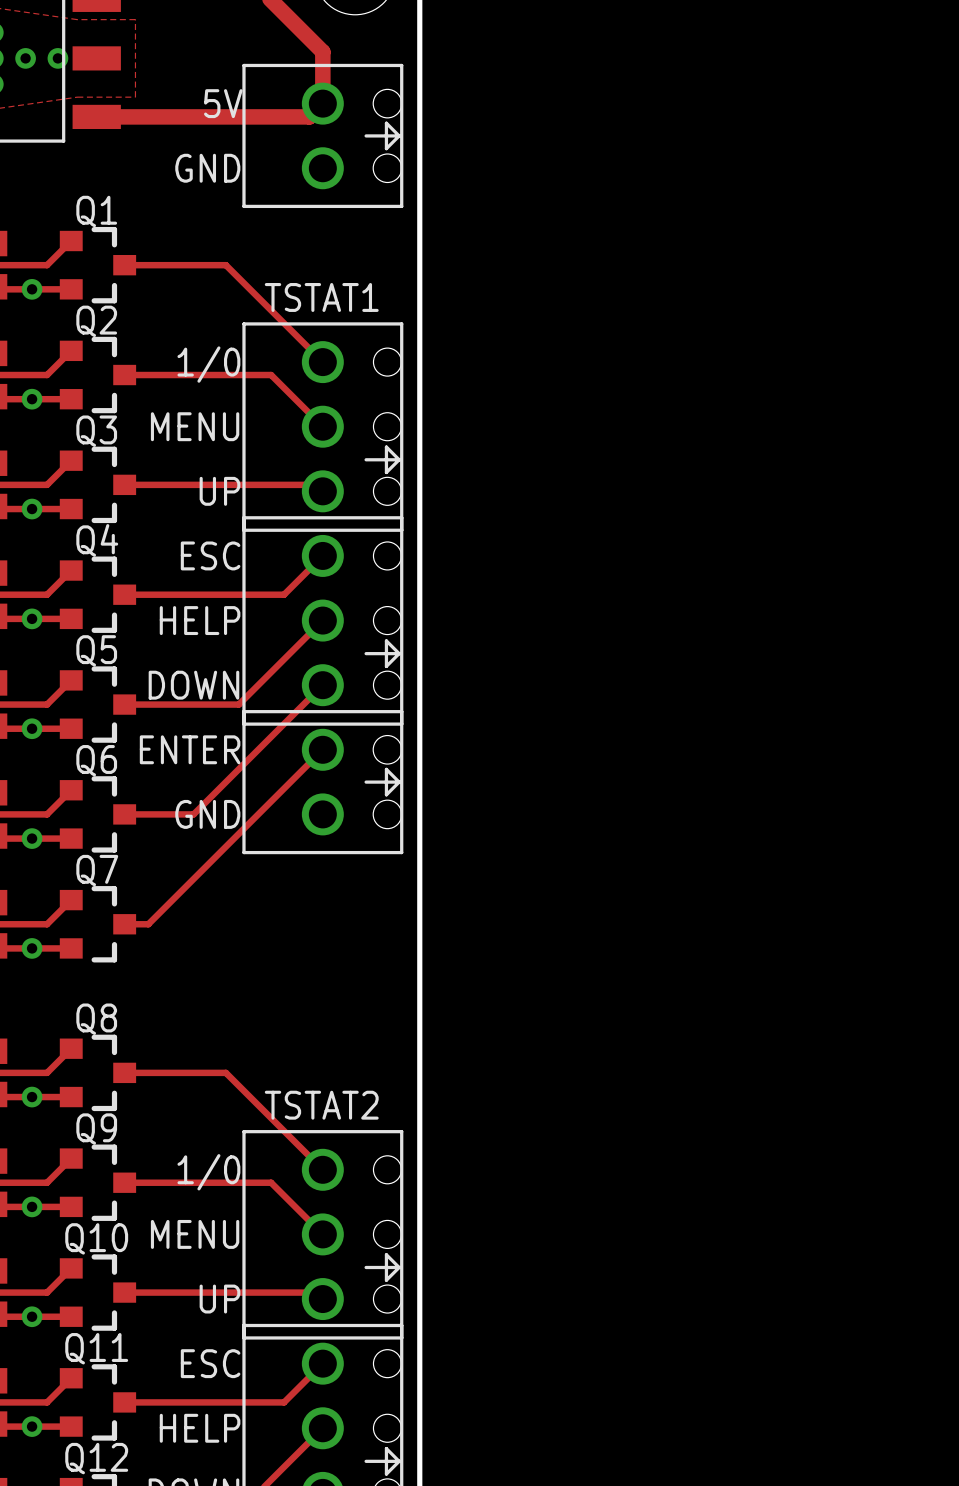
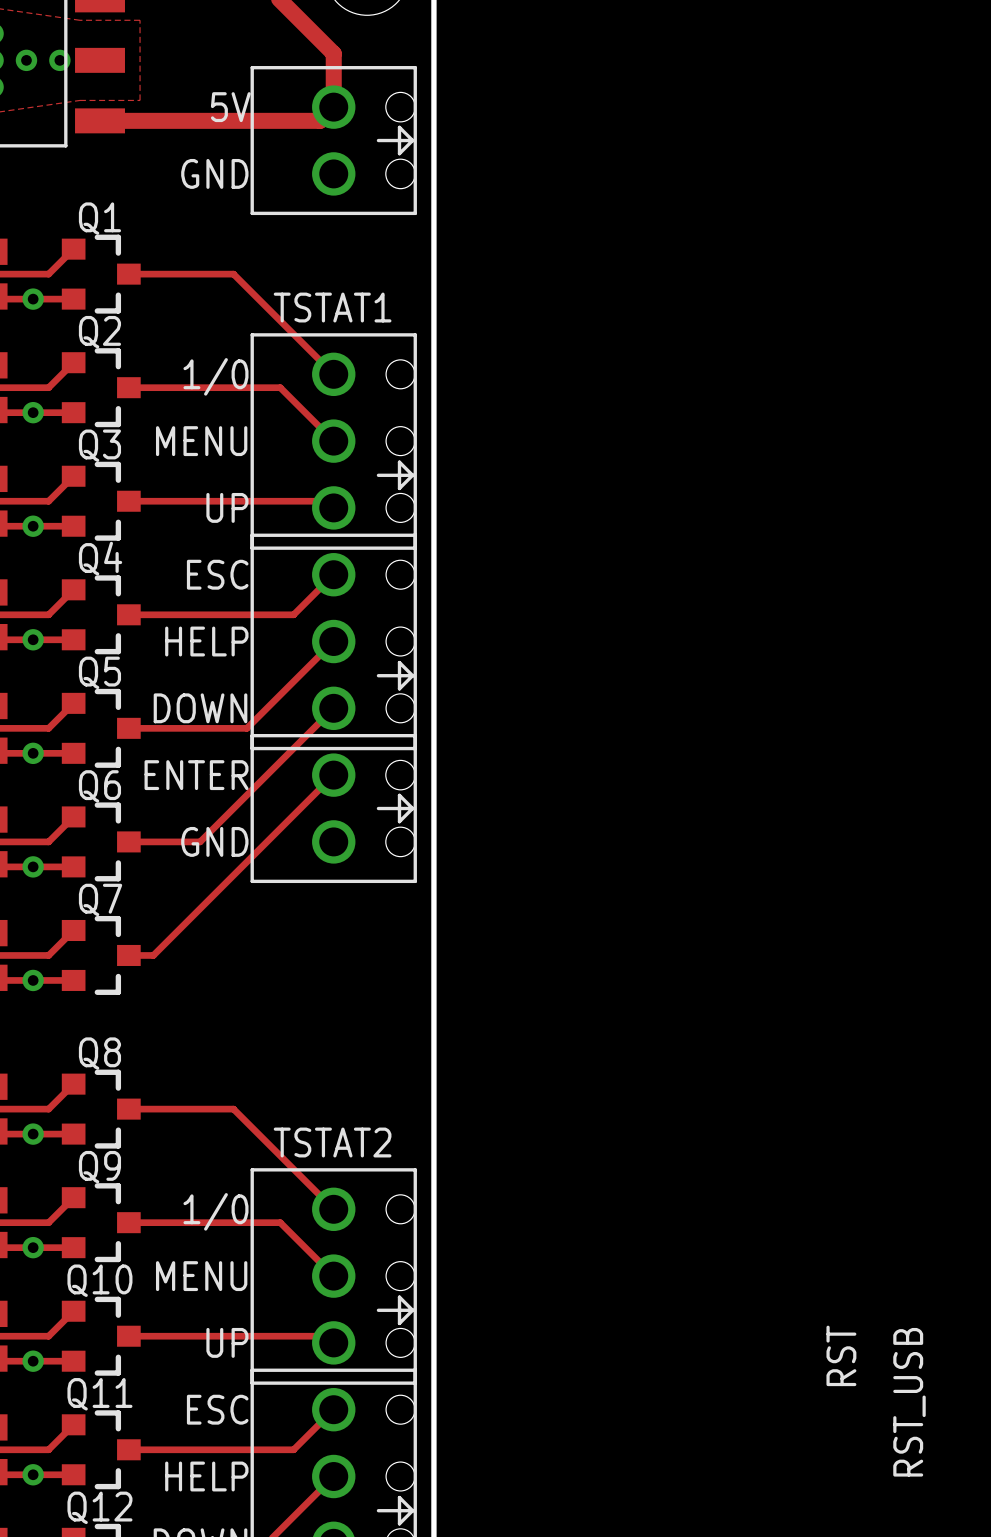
text: none -> RST (841, 1355)
text: none -> RST_USB (909, 1402)

